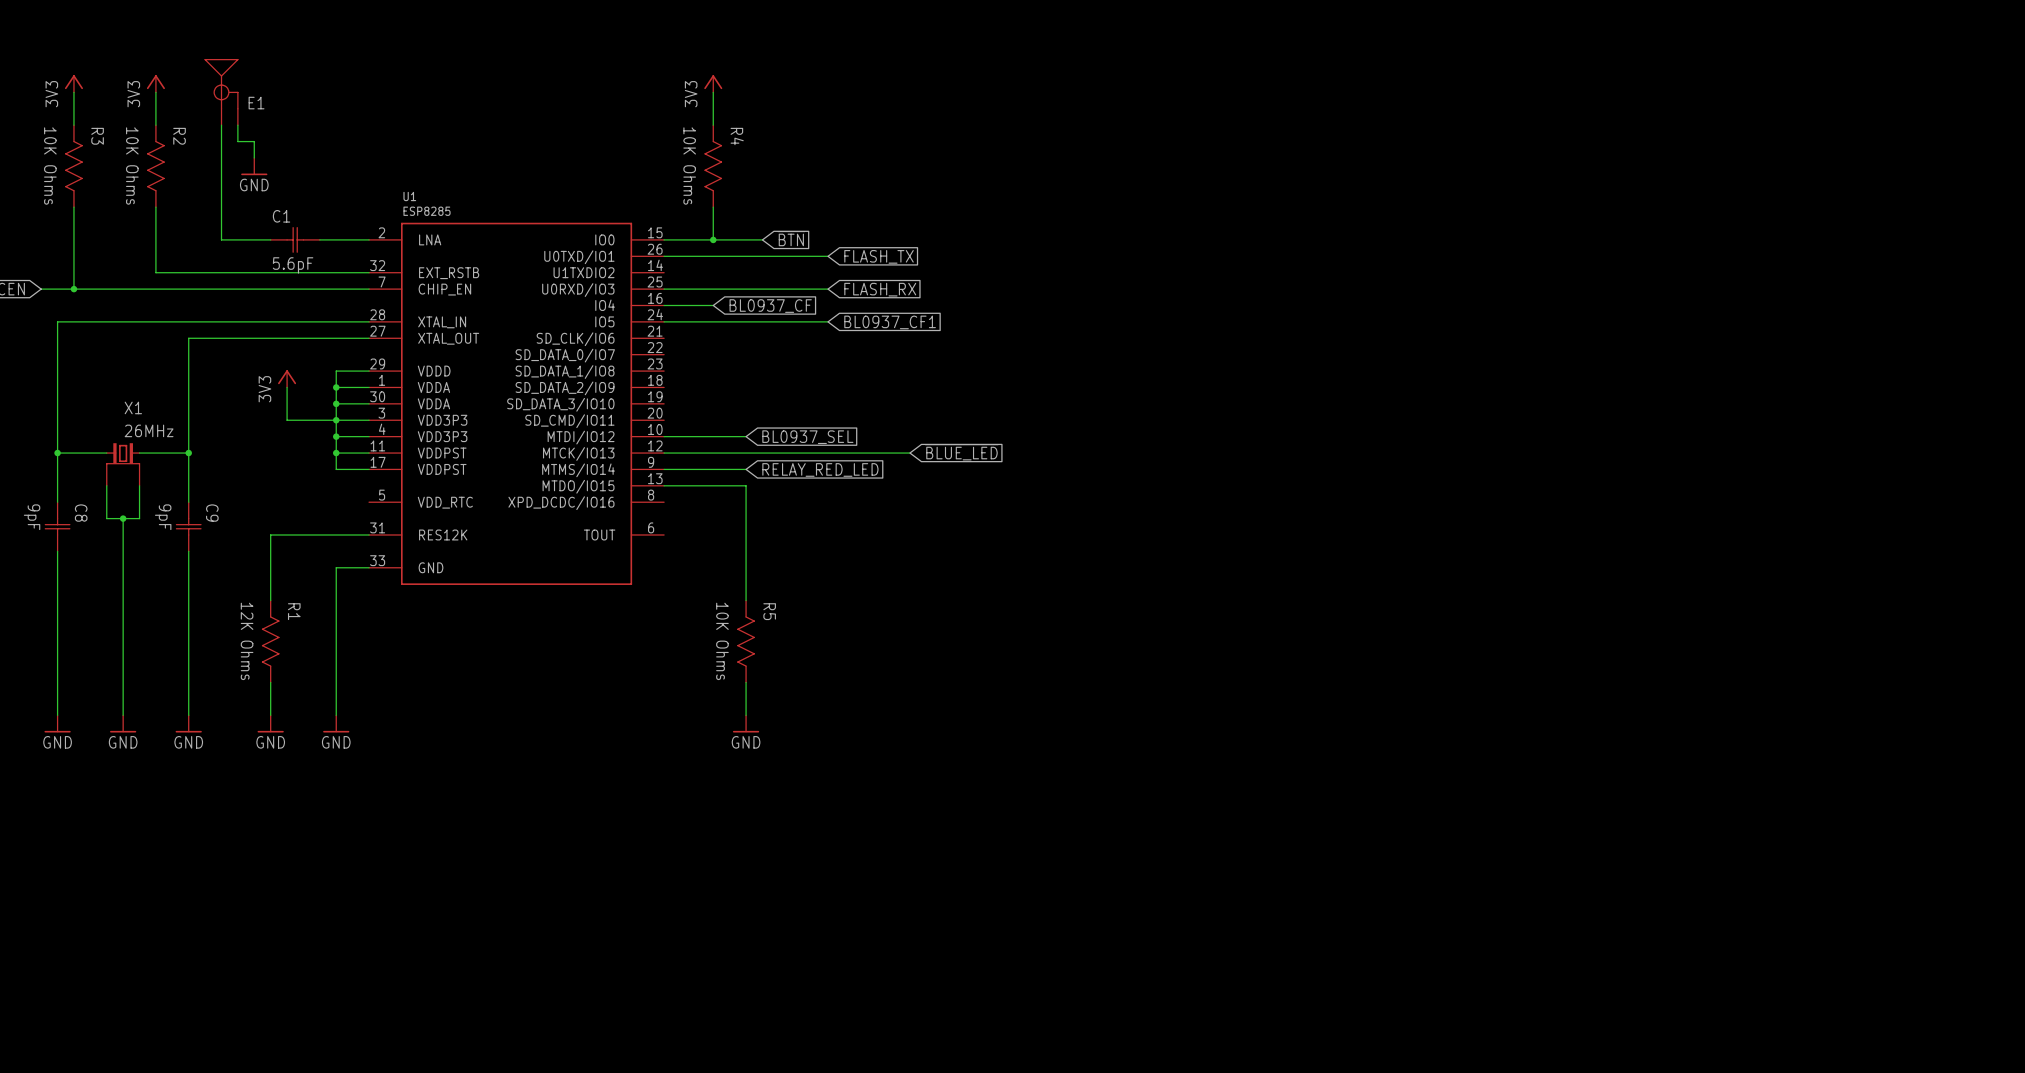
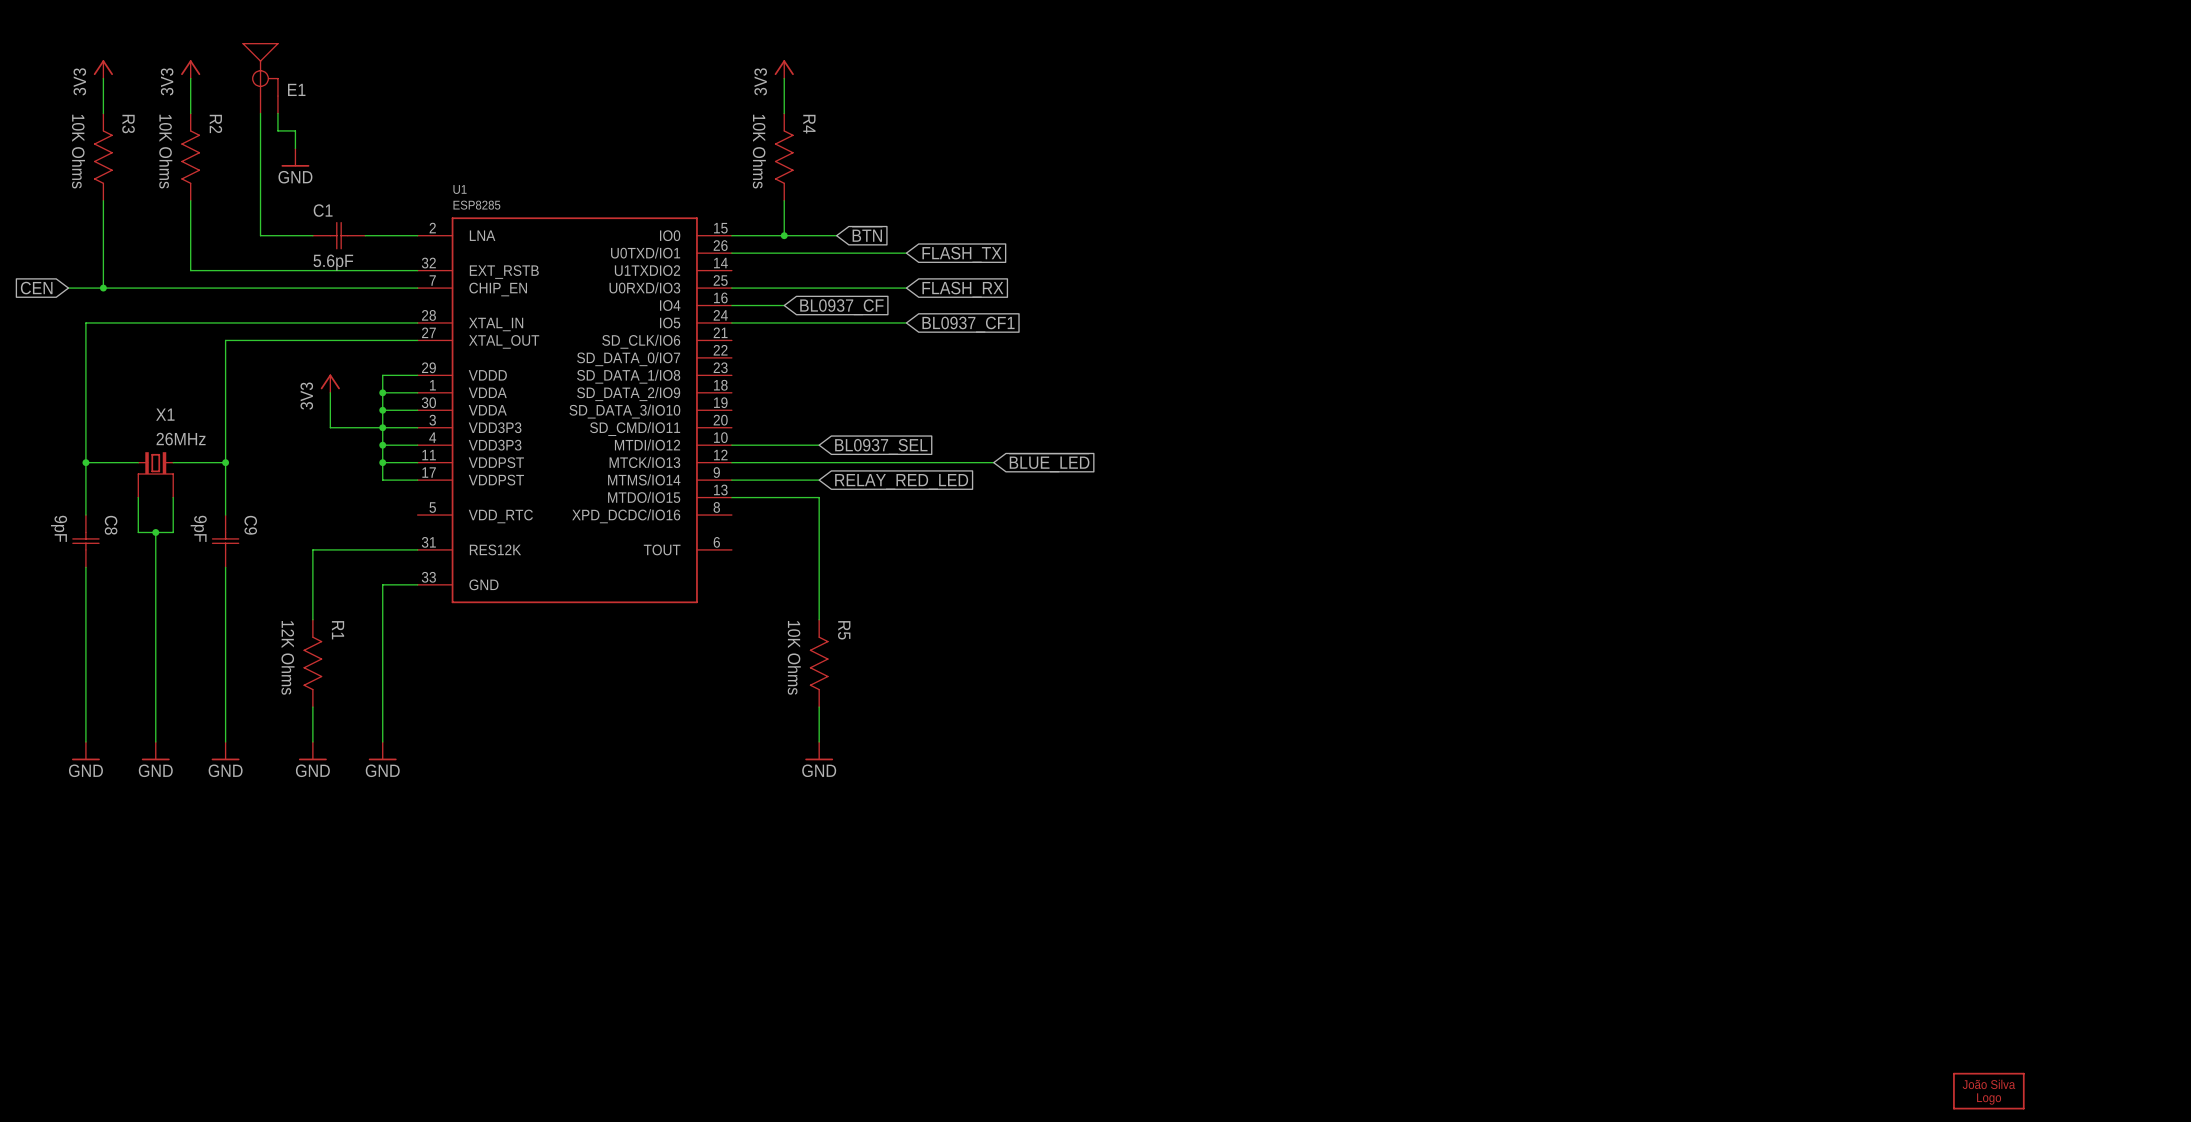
part: none -> (1988, 1091)

